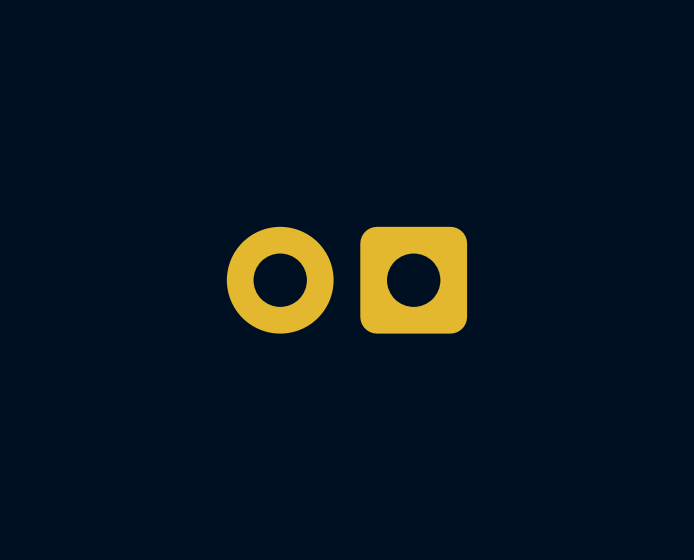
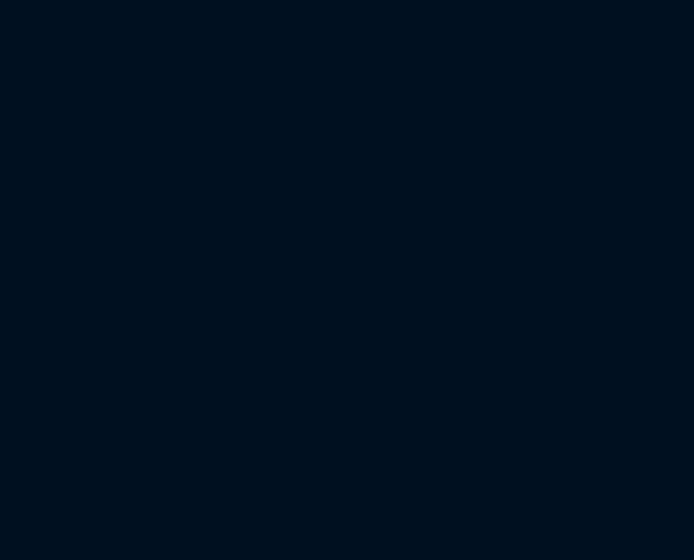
part: (346, 280) -> none

